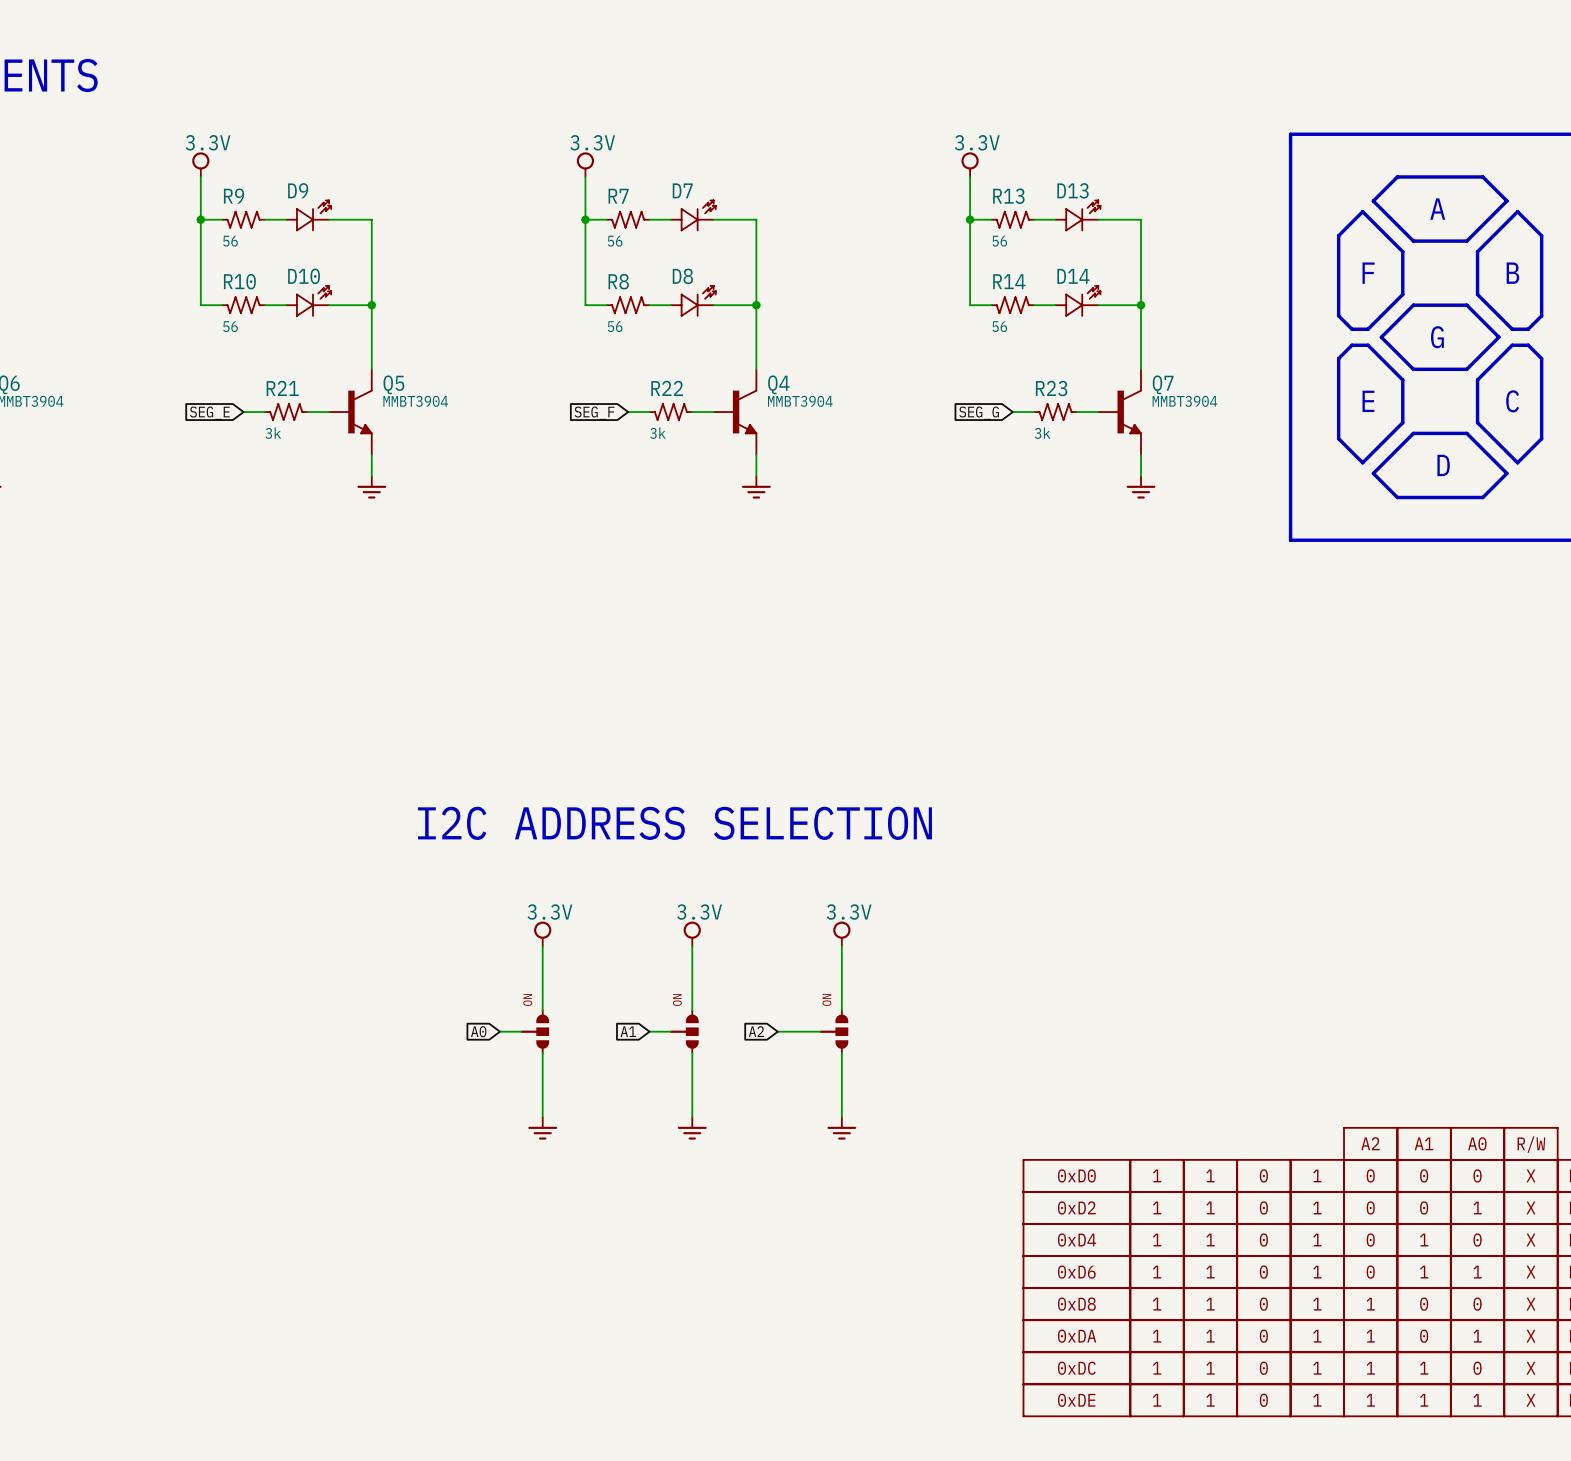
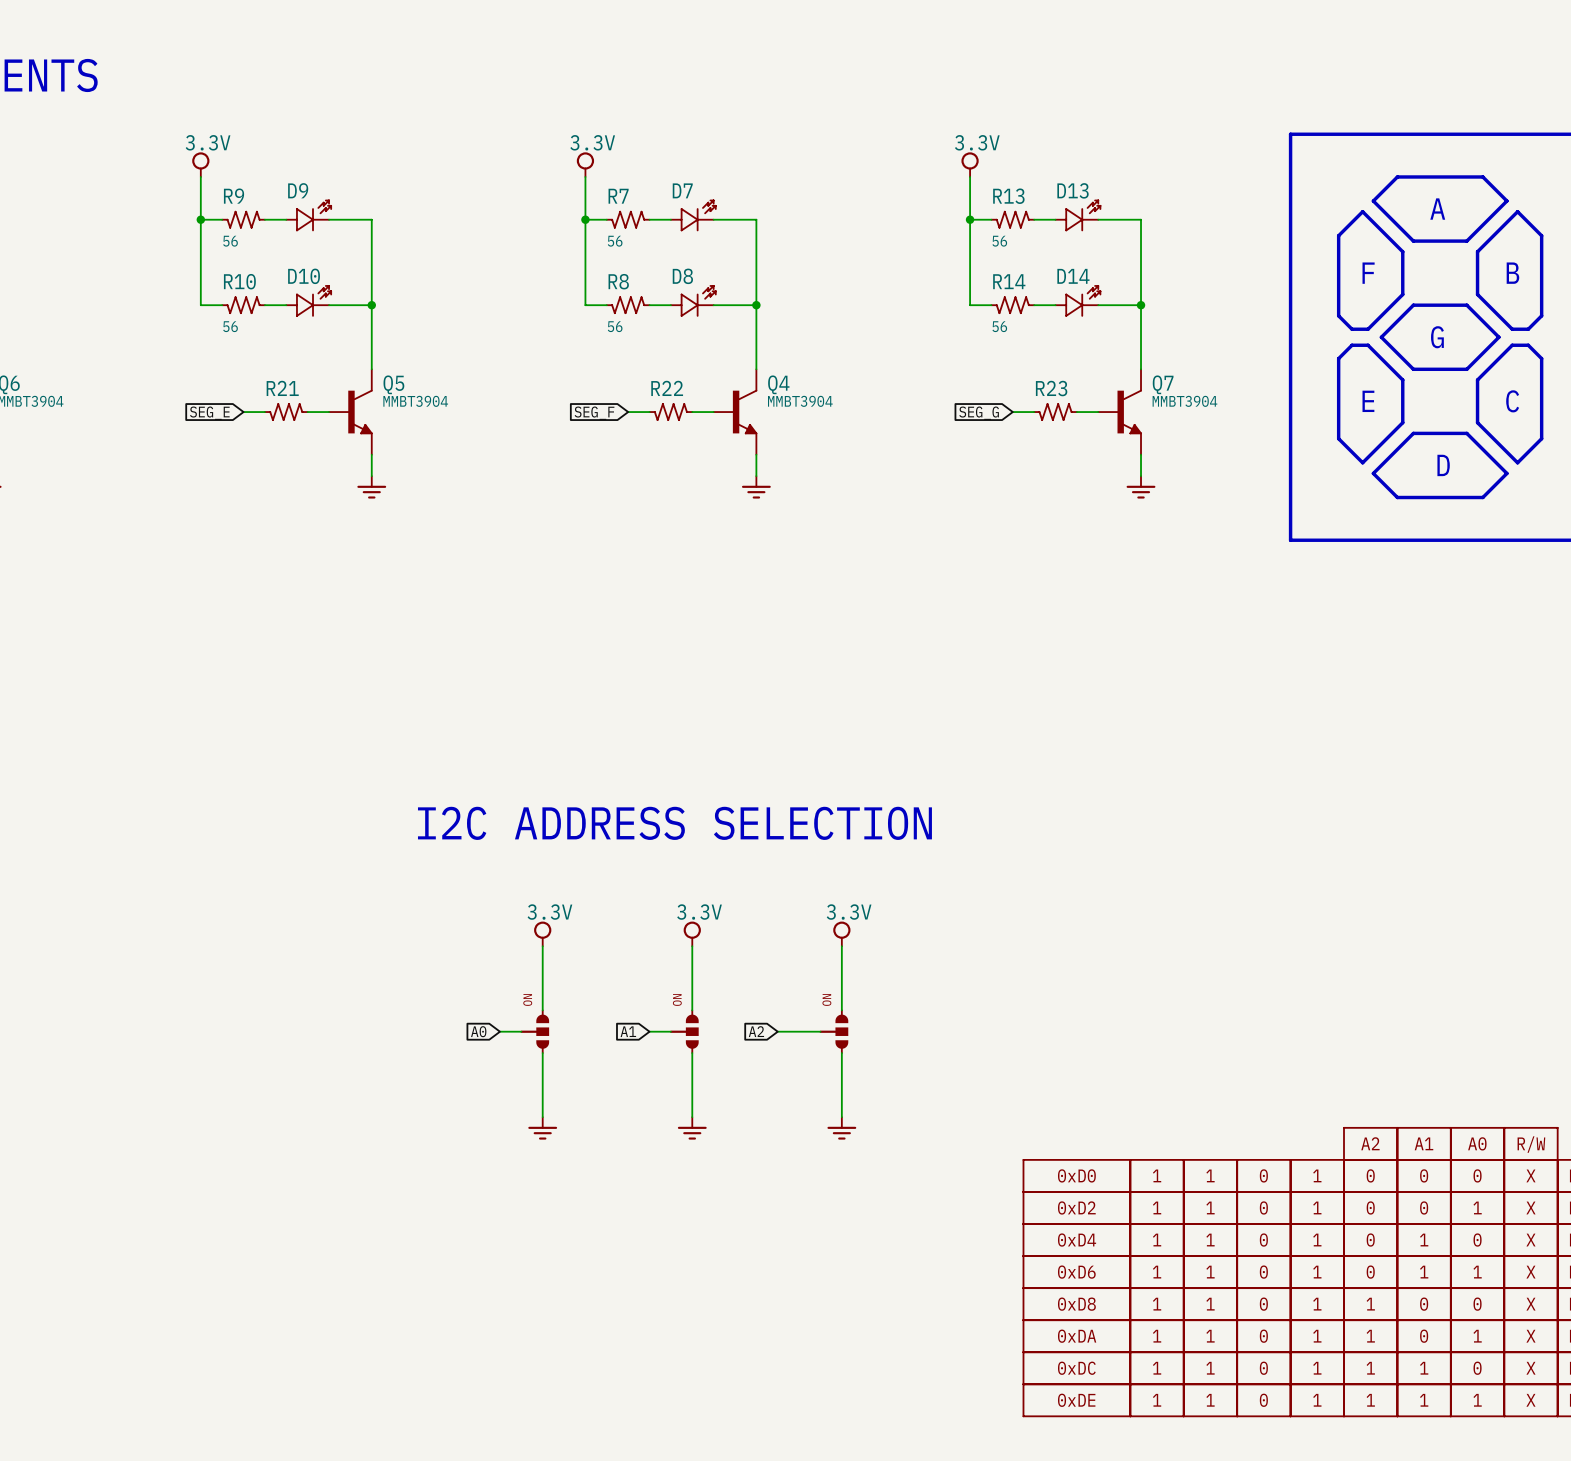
R21 value: 3k (273, 433) -> none
R22 value: 3k (657, 433) -> none
R23 value: 3k (1042, 433) -> none

